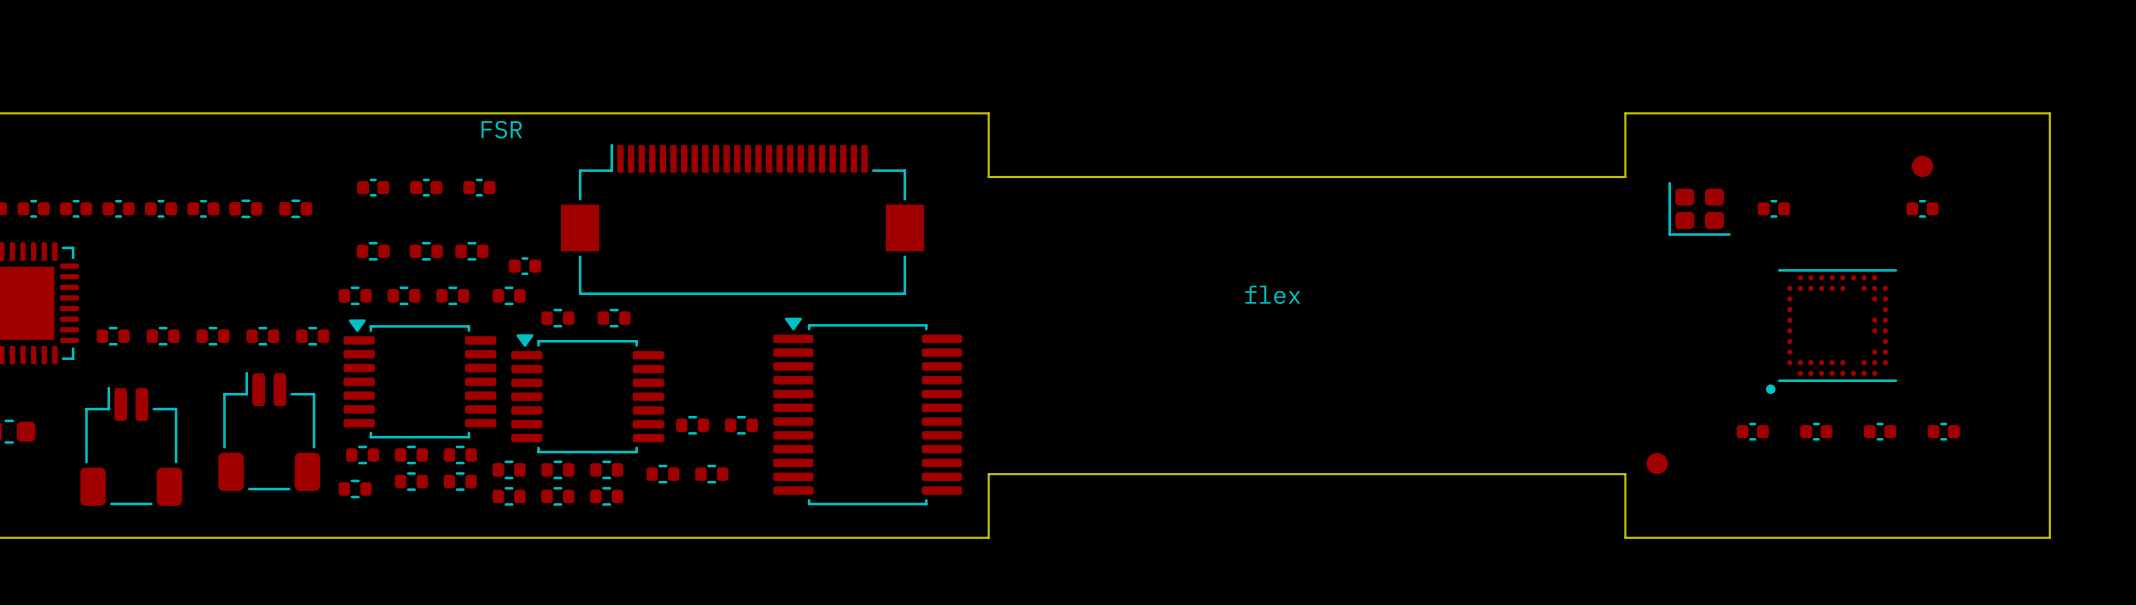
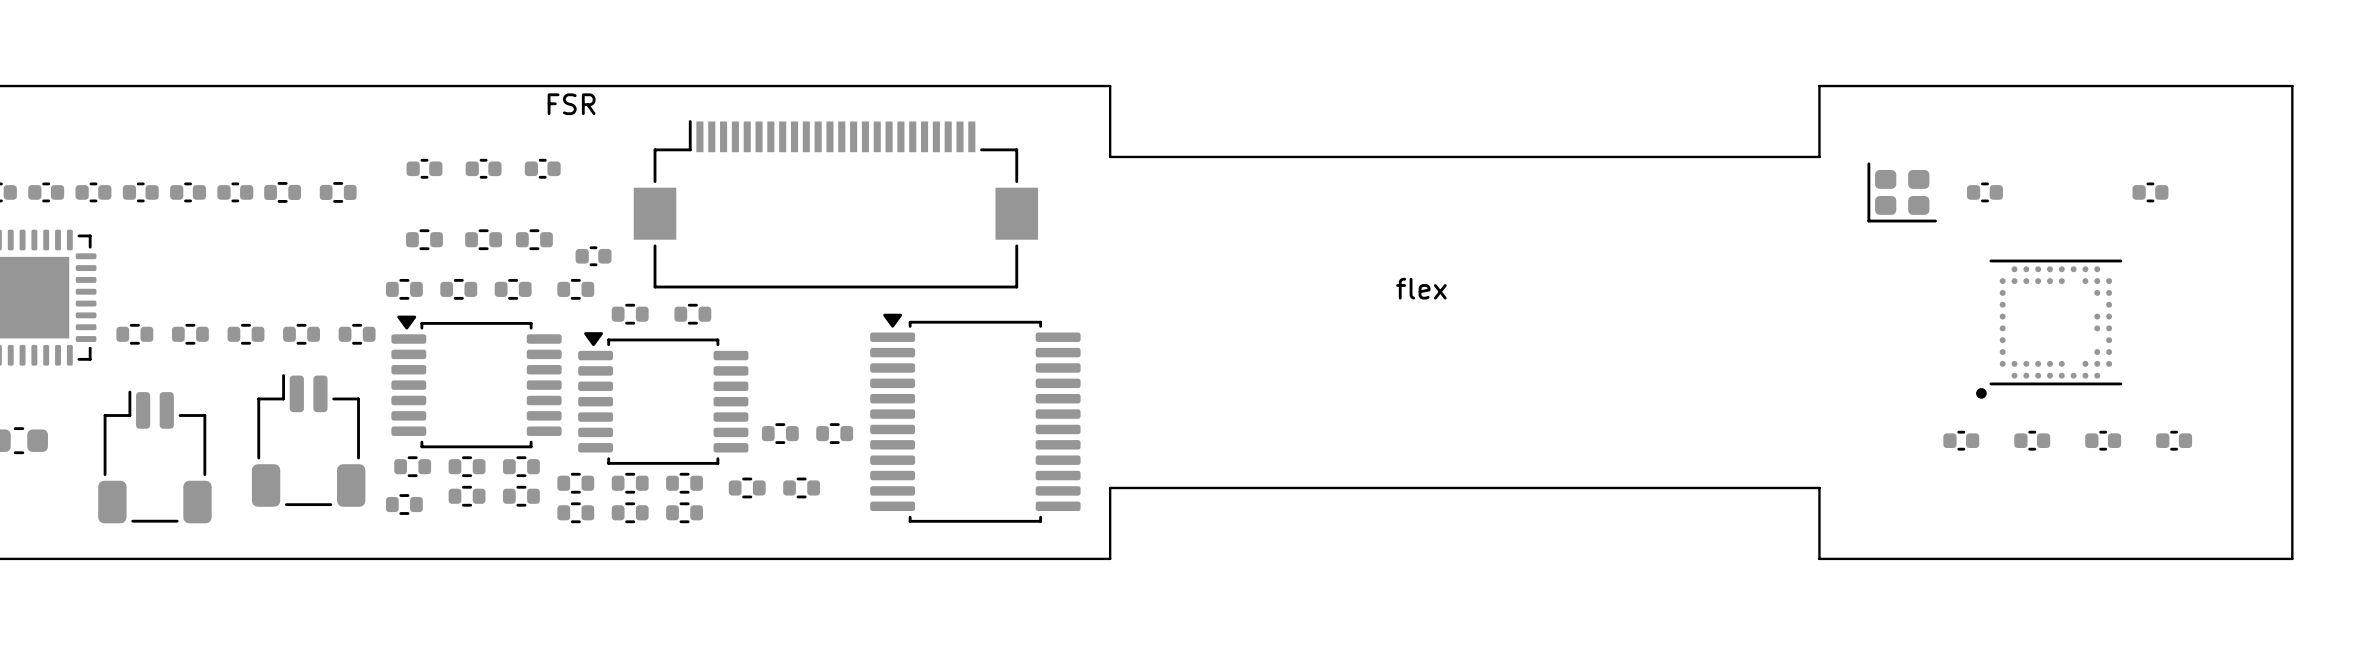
part: (1922, 166) -> none
part: (1657, 463) -> none

